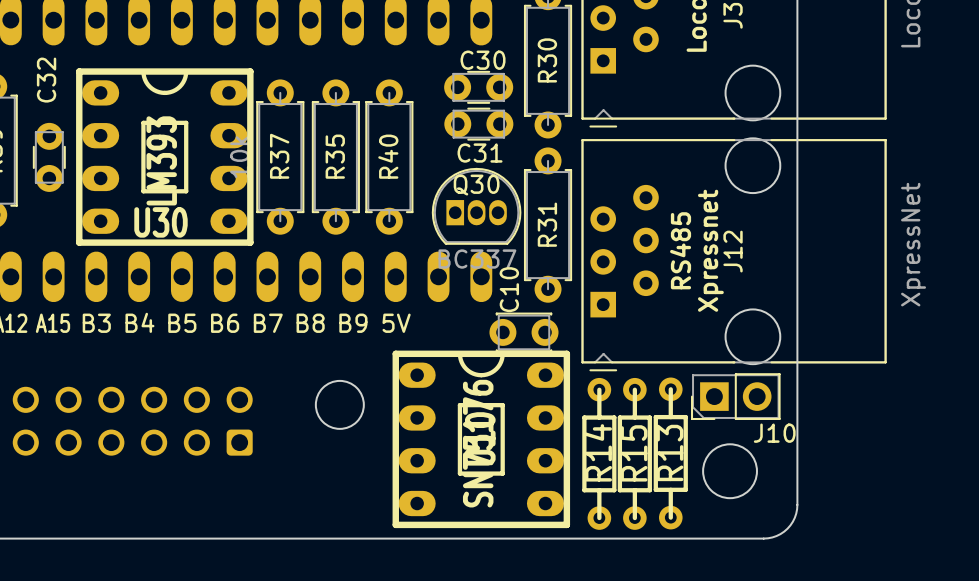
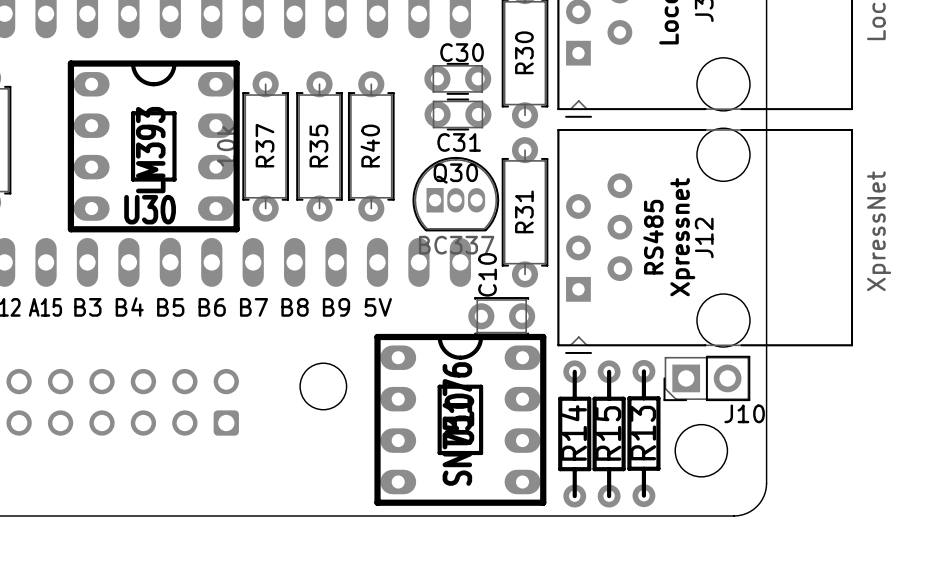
C32: (49, 157) -> none

